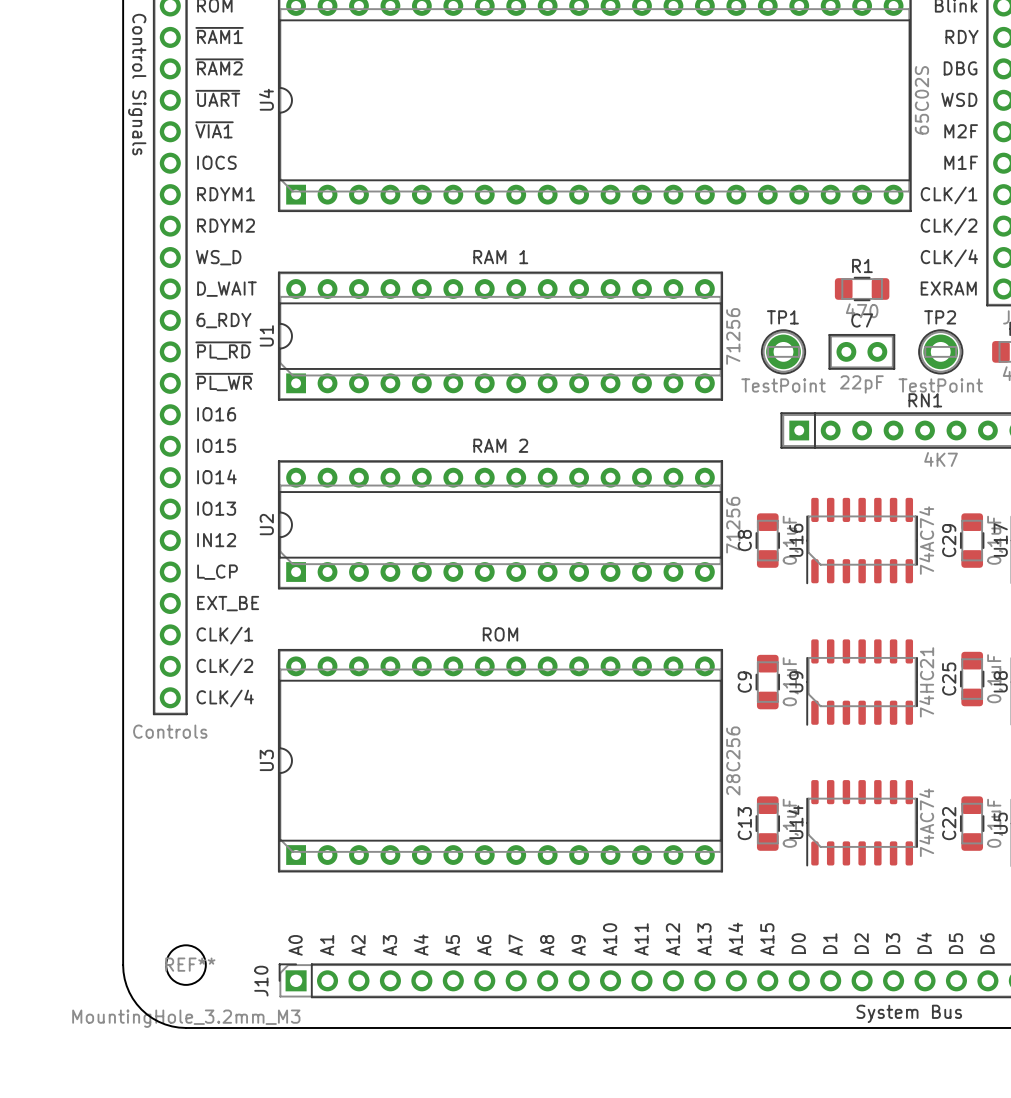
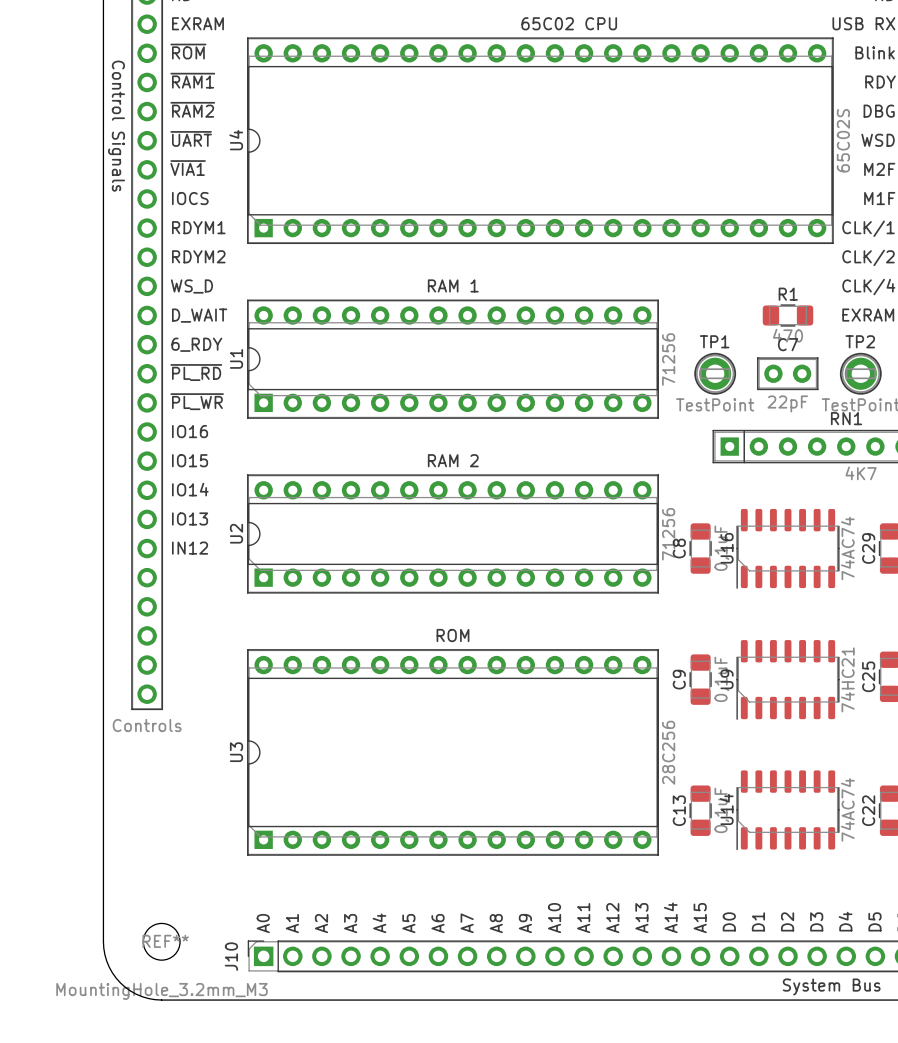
text: L_CP (217, 572) -> none
text: EXT_BE (228, 603) -> none
text: CLK/1 (224, 635) -> none
text: CLK/2 (224, 667) -> none
text: CLK/4 (225, 698) -> none

